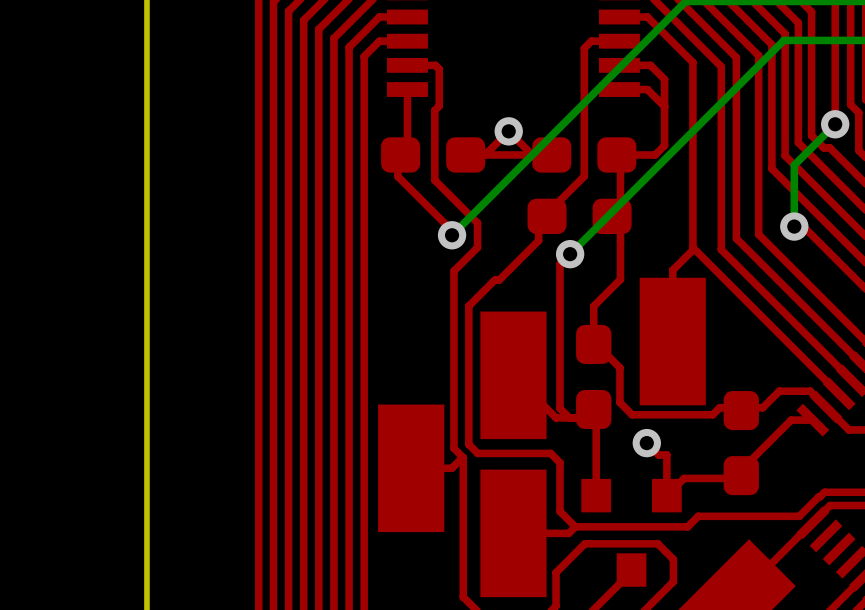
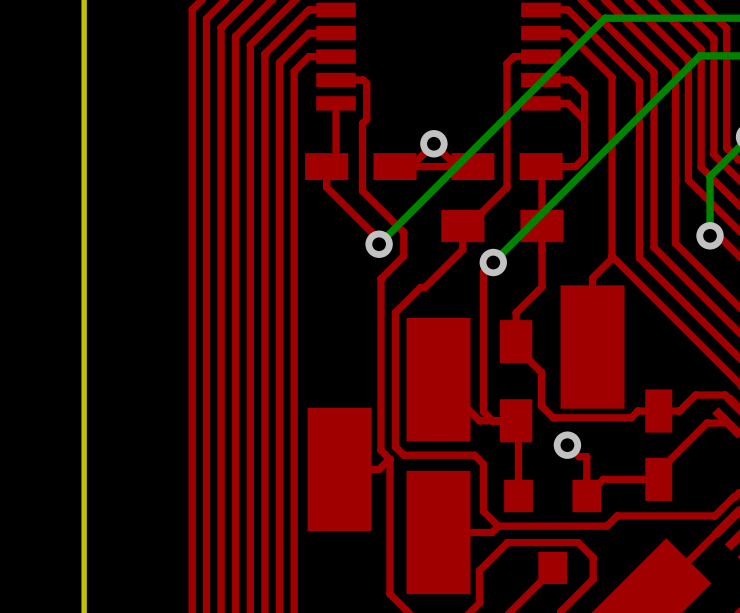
part footprint: [381, 137, 486, 173] -> [305, 153, 417, 181]
part footprint: [532, 137, 637, 173] -> [451, 153, 563, 181]
part footprint: [527, 198, 632, 235] -> [441, 209, 564, 243]
part footprint: [576, 324, 612, 430] -> [499, 320, 533, 443]
part footprint: [723, 391, 759, 496] -> [645, 389, 673, 501]

